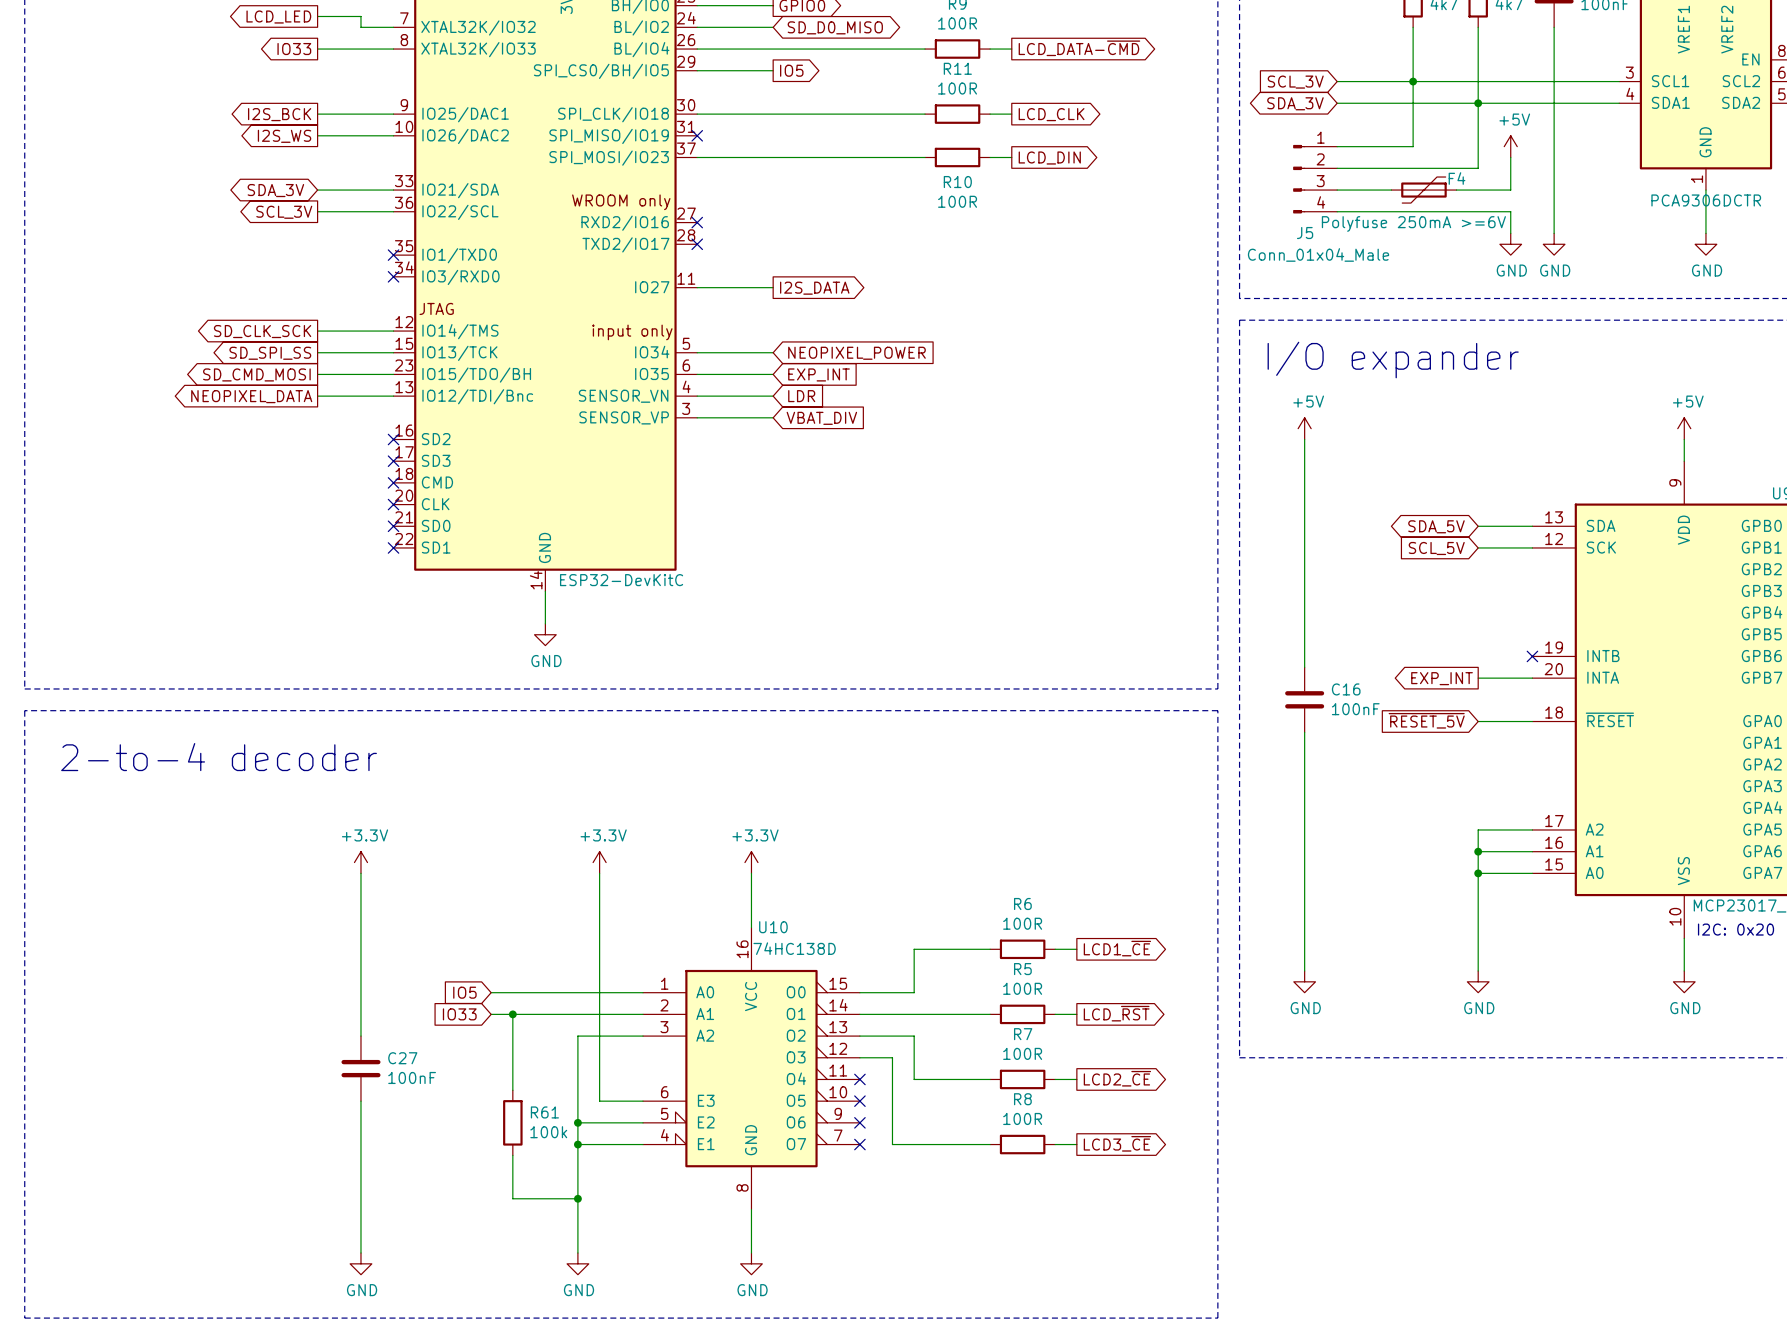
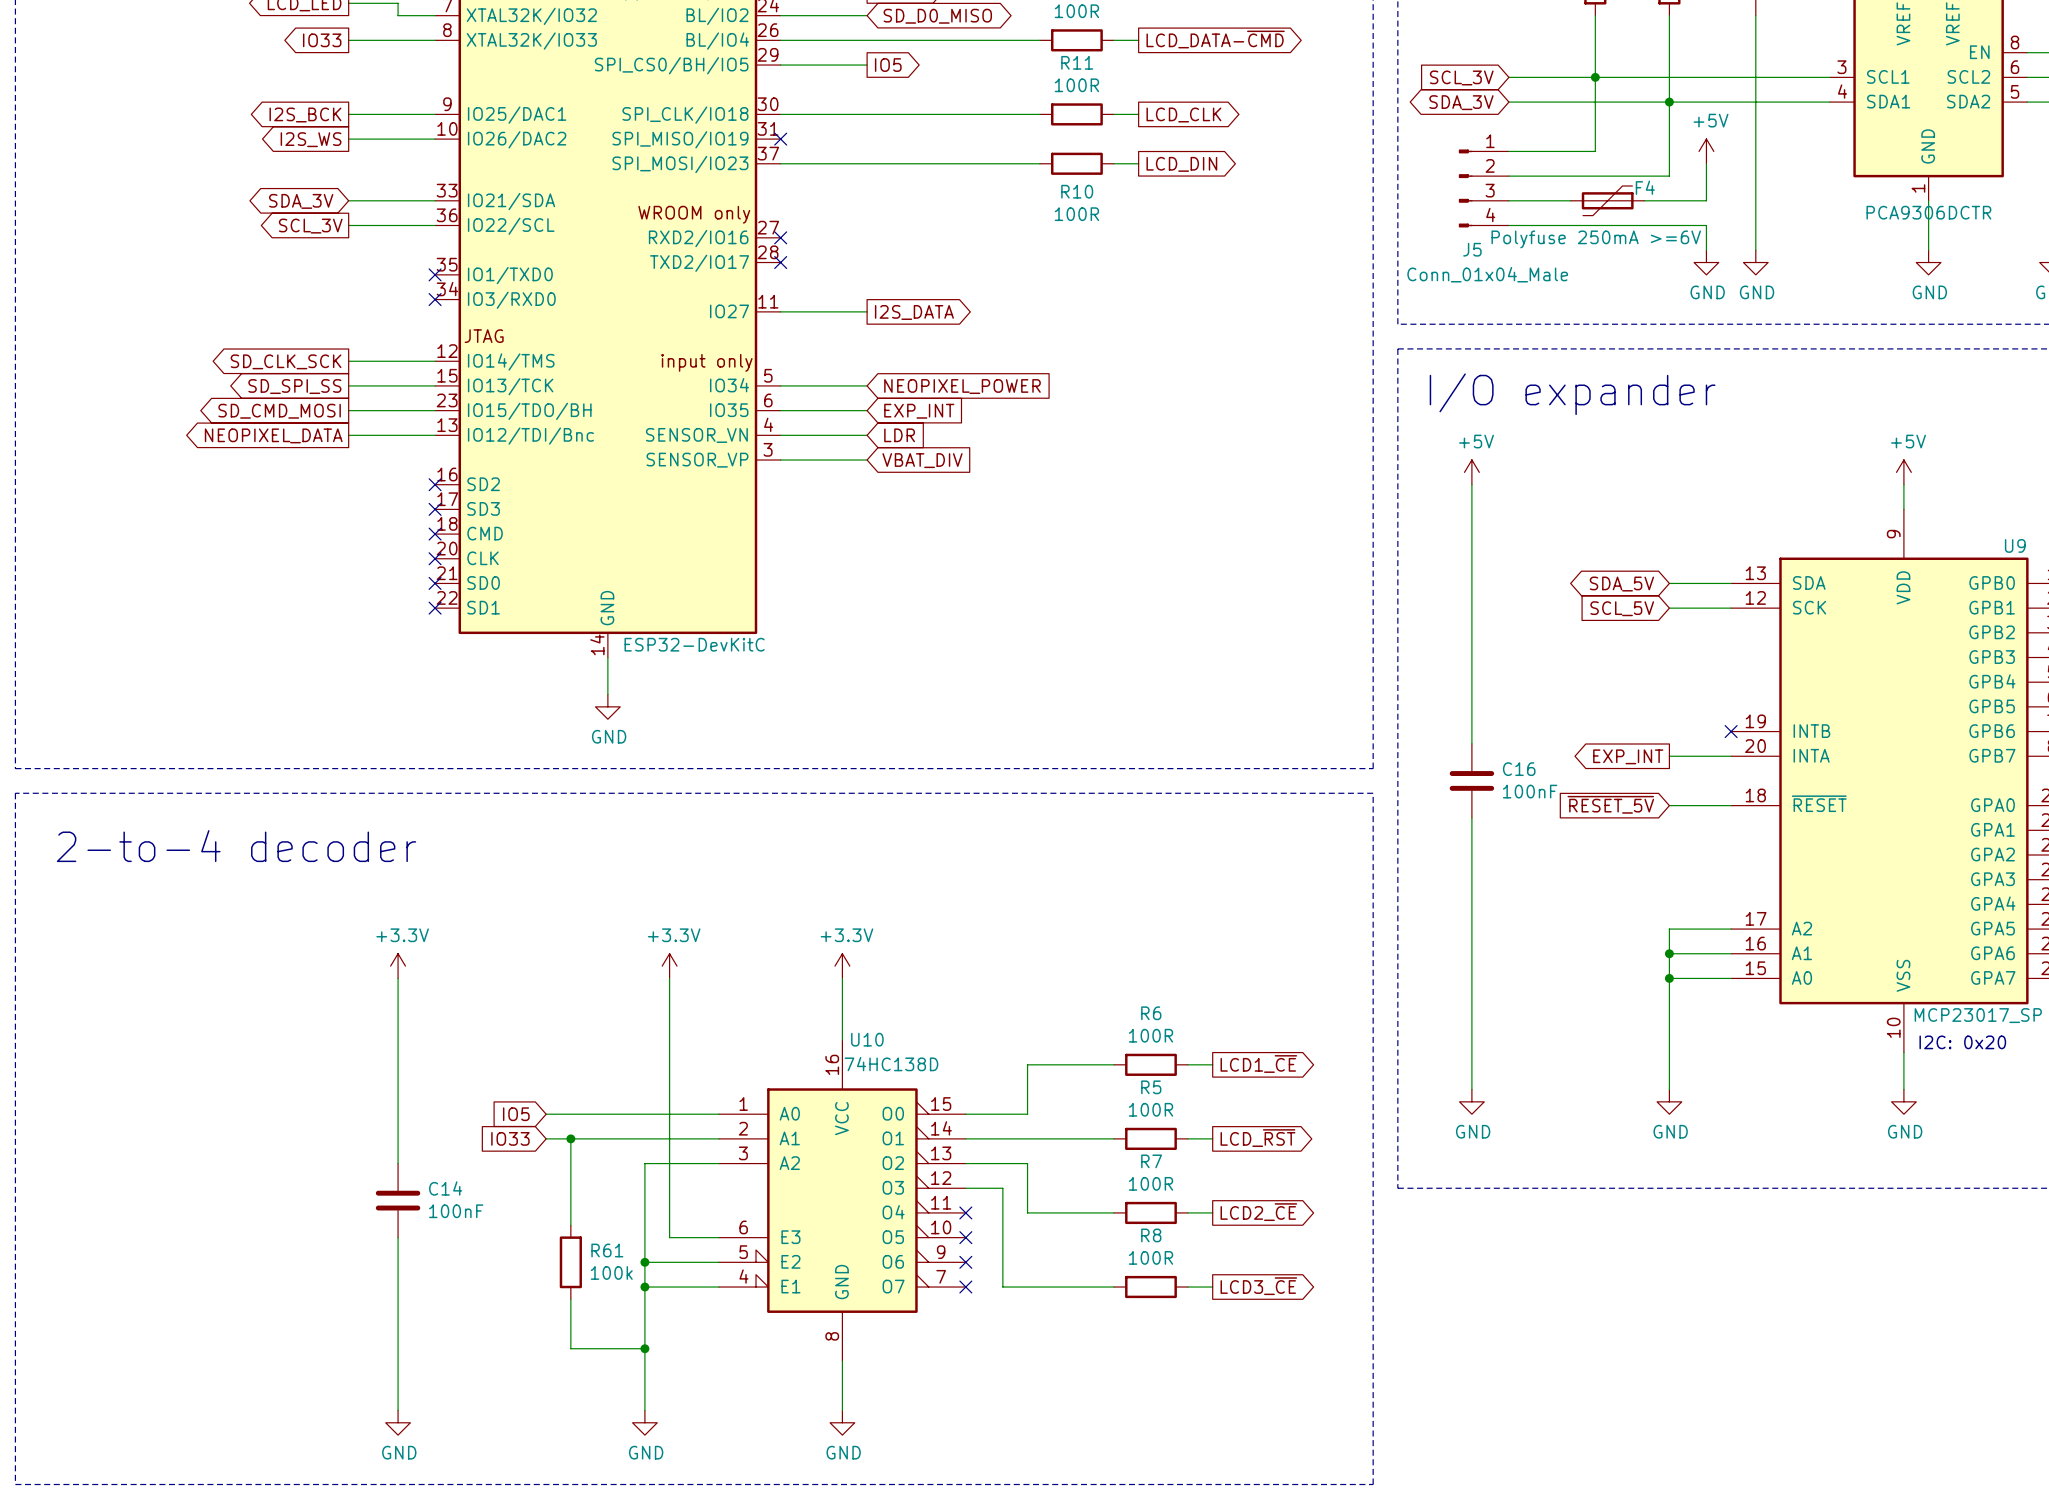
C27 name: C27 (402, 1058) -> C14 (445, 1188)

